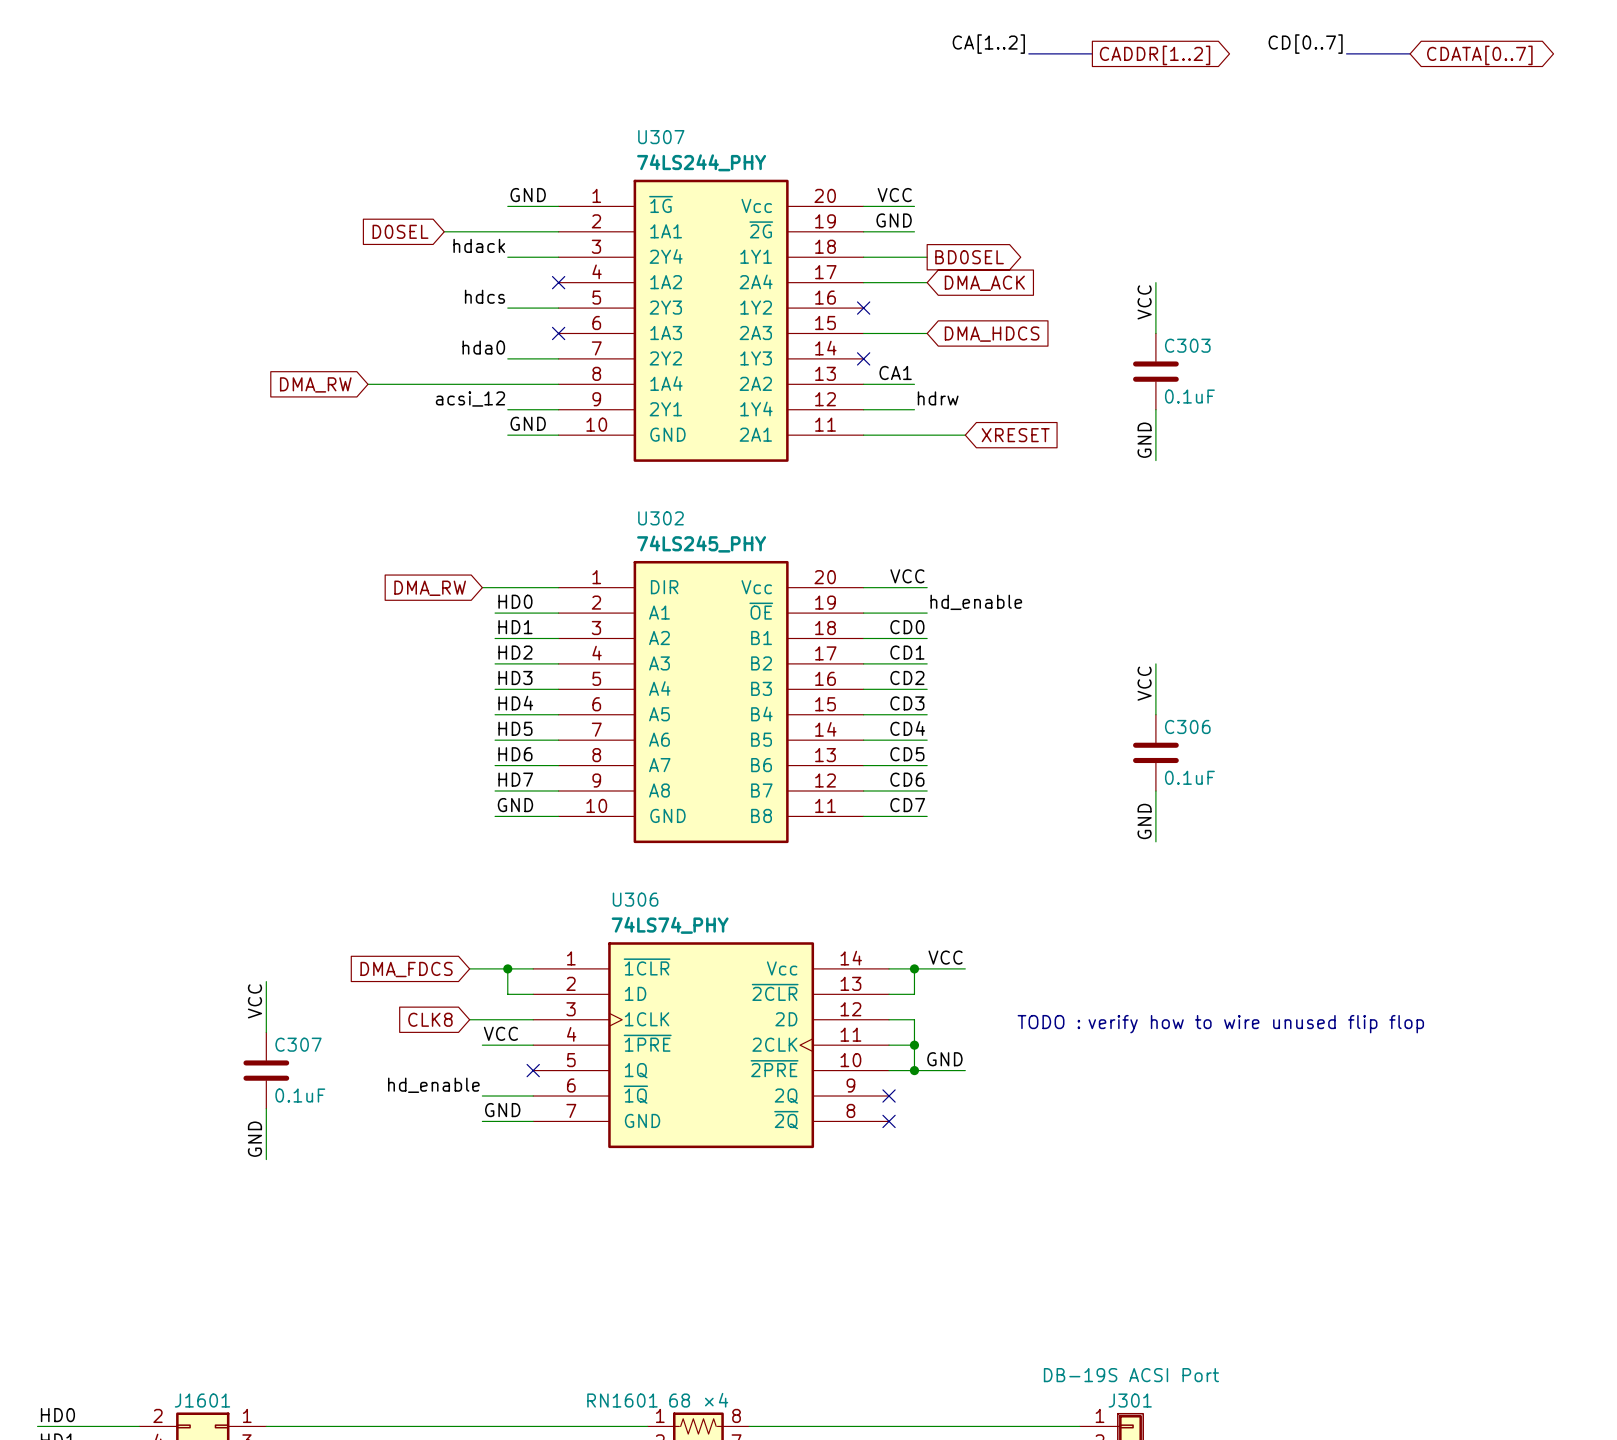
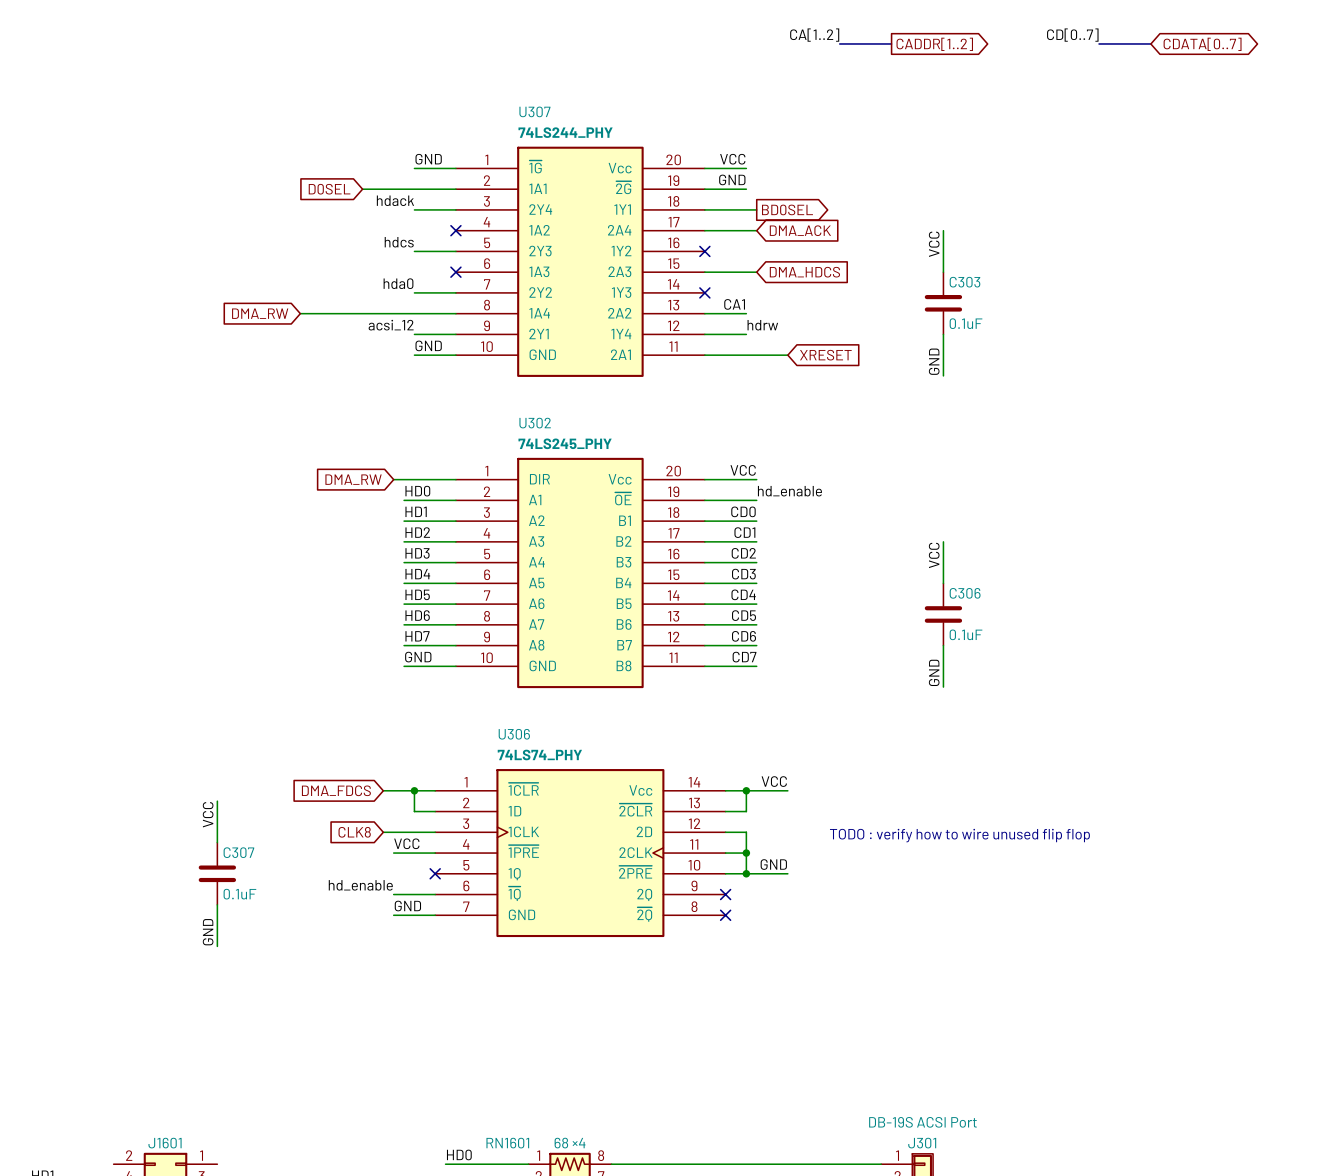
label: HD0 (57, 1415) -> none
label: none -> HD0 (459, 1154)
wire: (37, 1426) (139, 1426) -> none
wire: (266, 1426) (545, 1426) -> none

